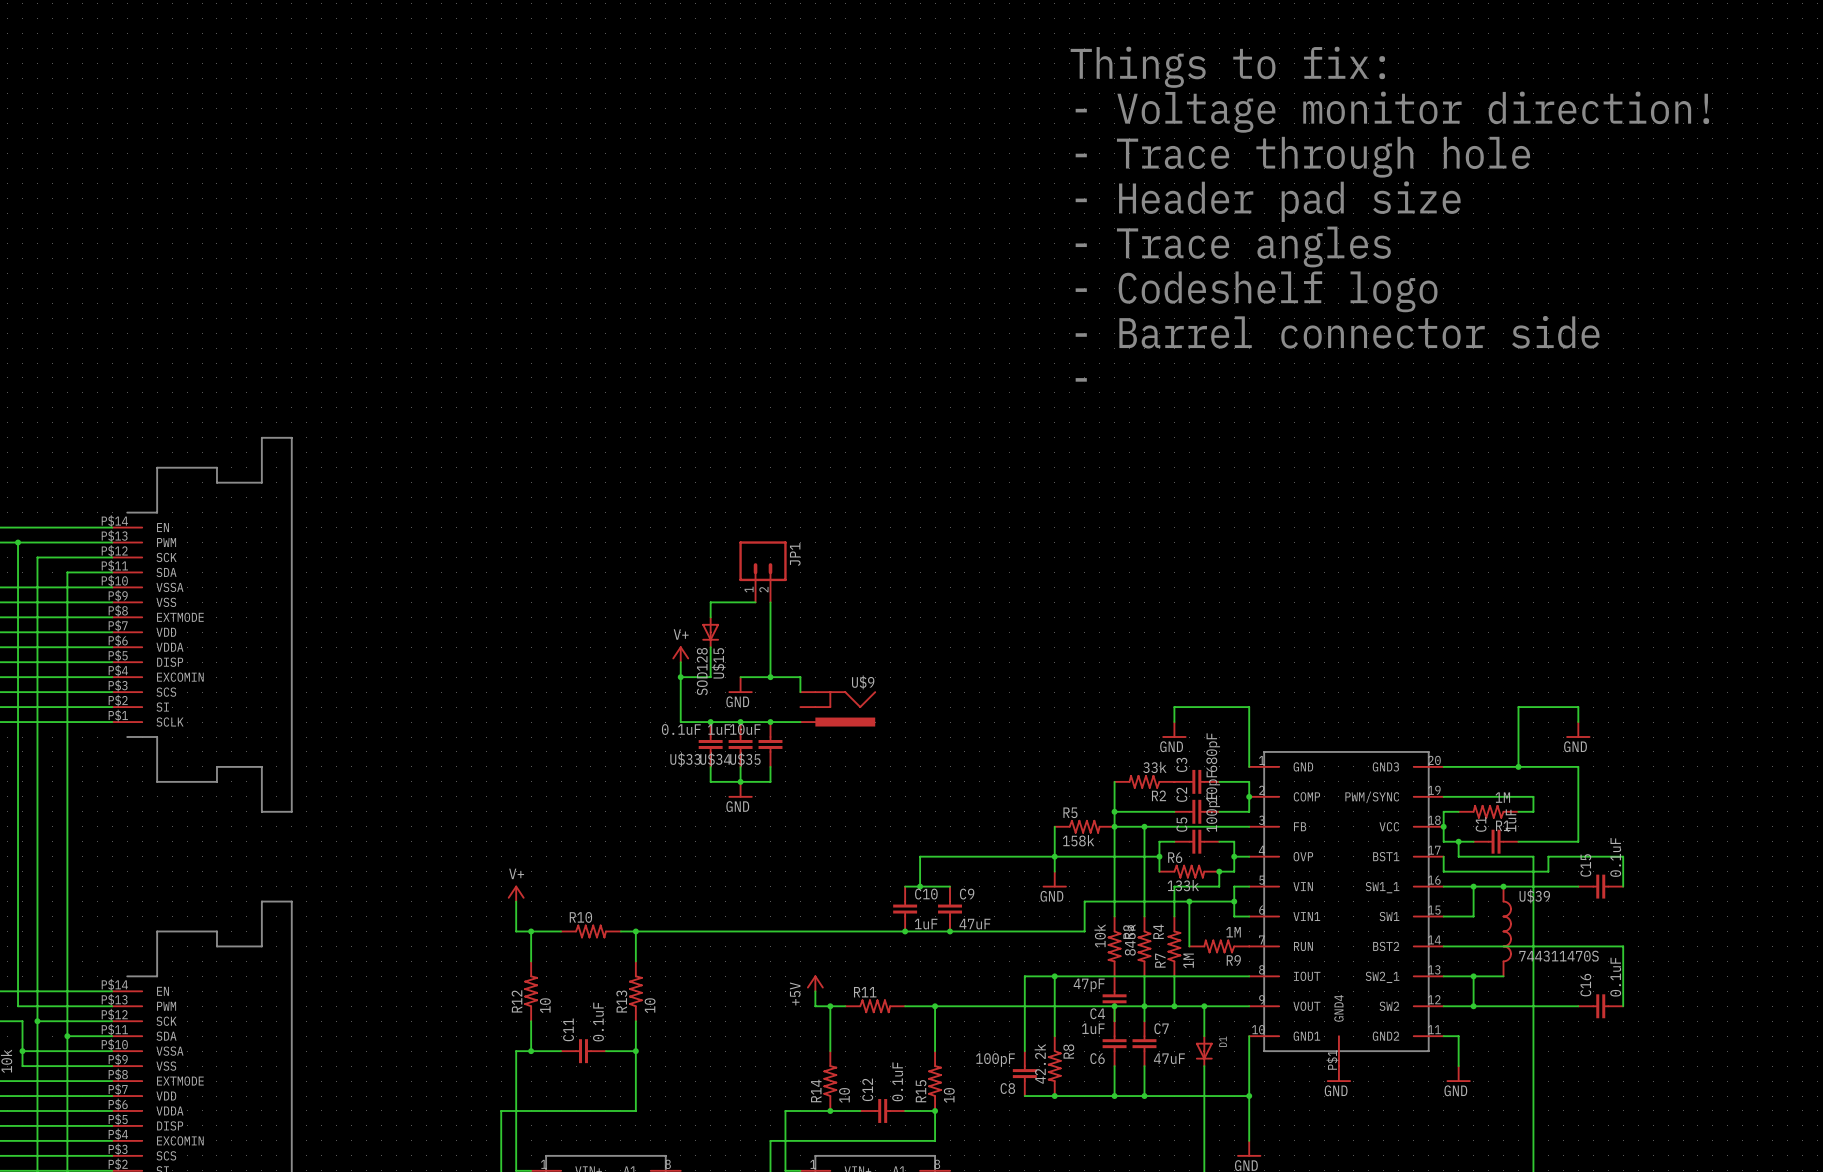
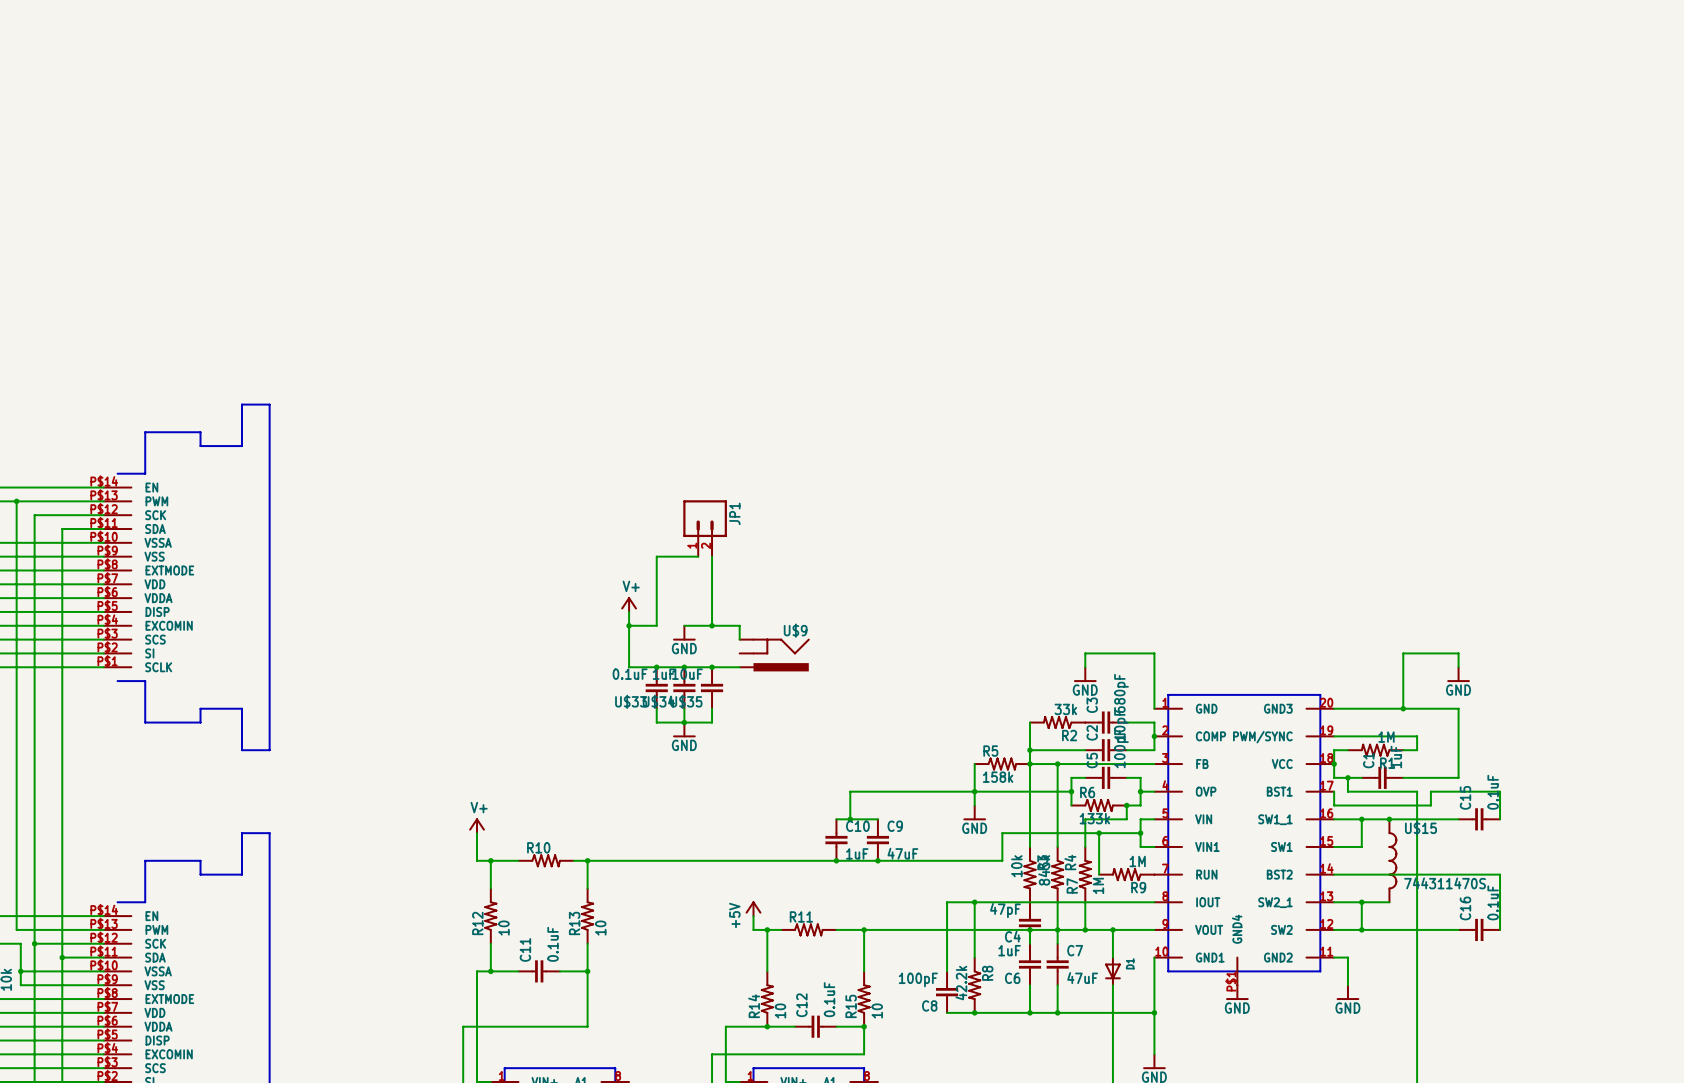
text: Things to fix: (1227, 67) -> none
text: - Voltage monitor direction! (1392, 112) -> none
text: - Trace through hole (1302, 157) -> none
text: - Header pad size (1268, 201) -> none
text: - Trace angles (1233, 246) -> none
text: - Codeshelf logo (1256, 291) -> none
text: - Barrel connector side (1337, 332) -> none
text: - (1081, 379) -> none
U$15: SOD128 (710, 632) -> none
U$39 name: U$39 (1534, 896) -> U$15 (1420, 828)

